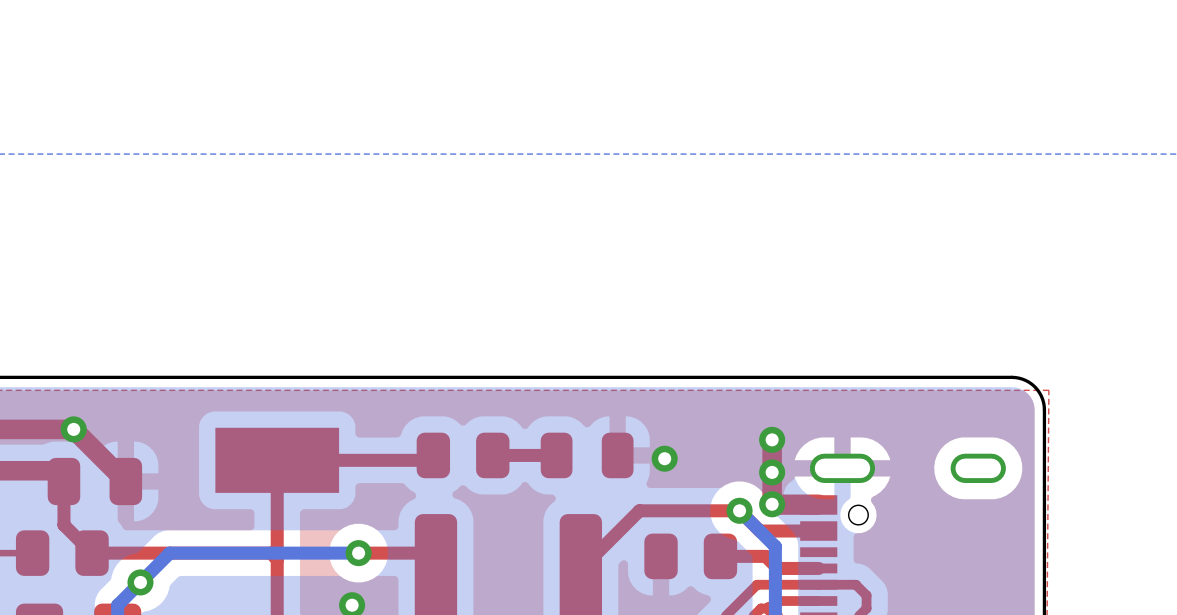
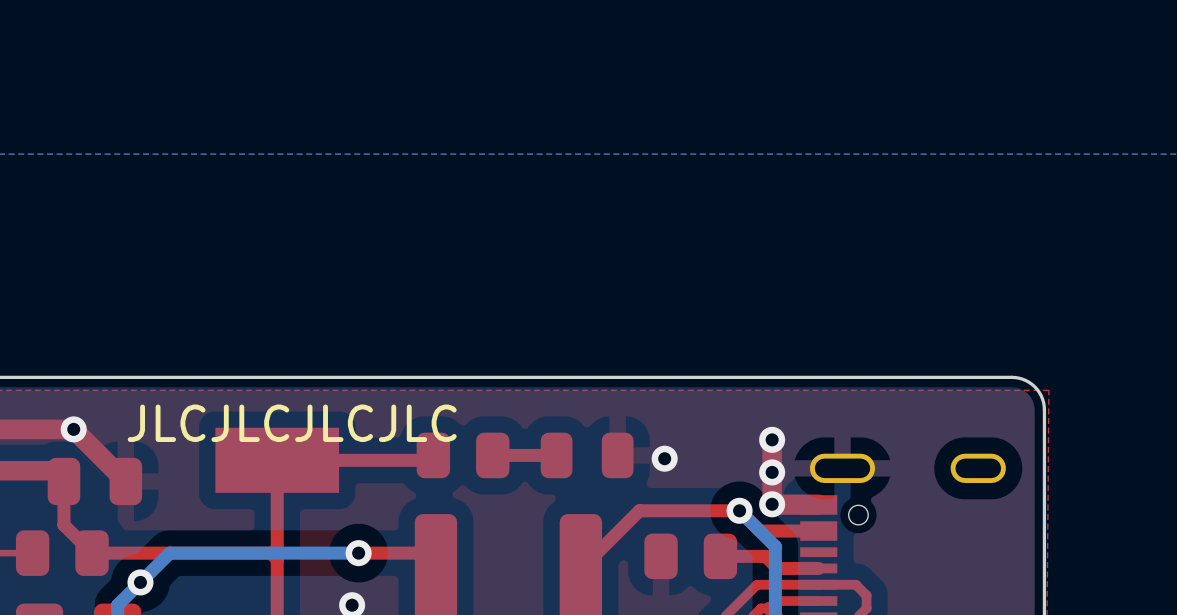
text: none -> JLCJLCJLCJLC (292, 423)

